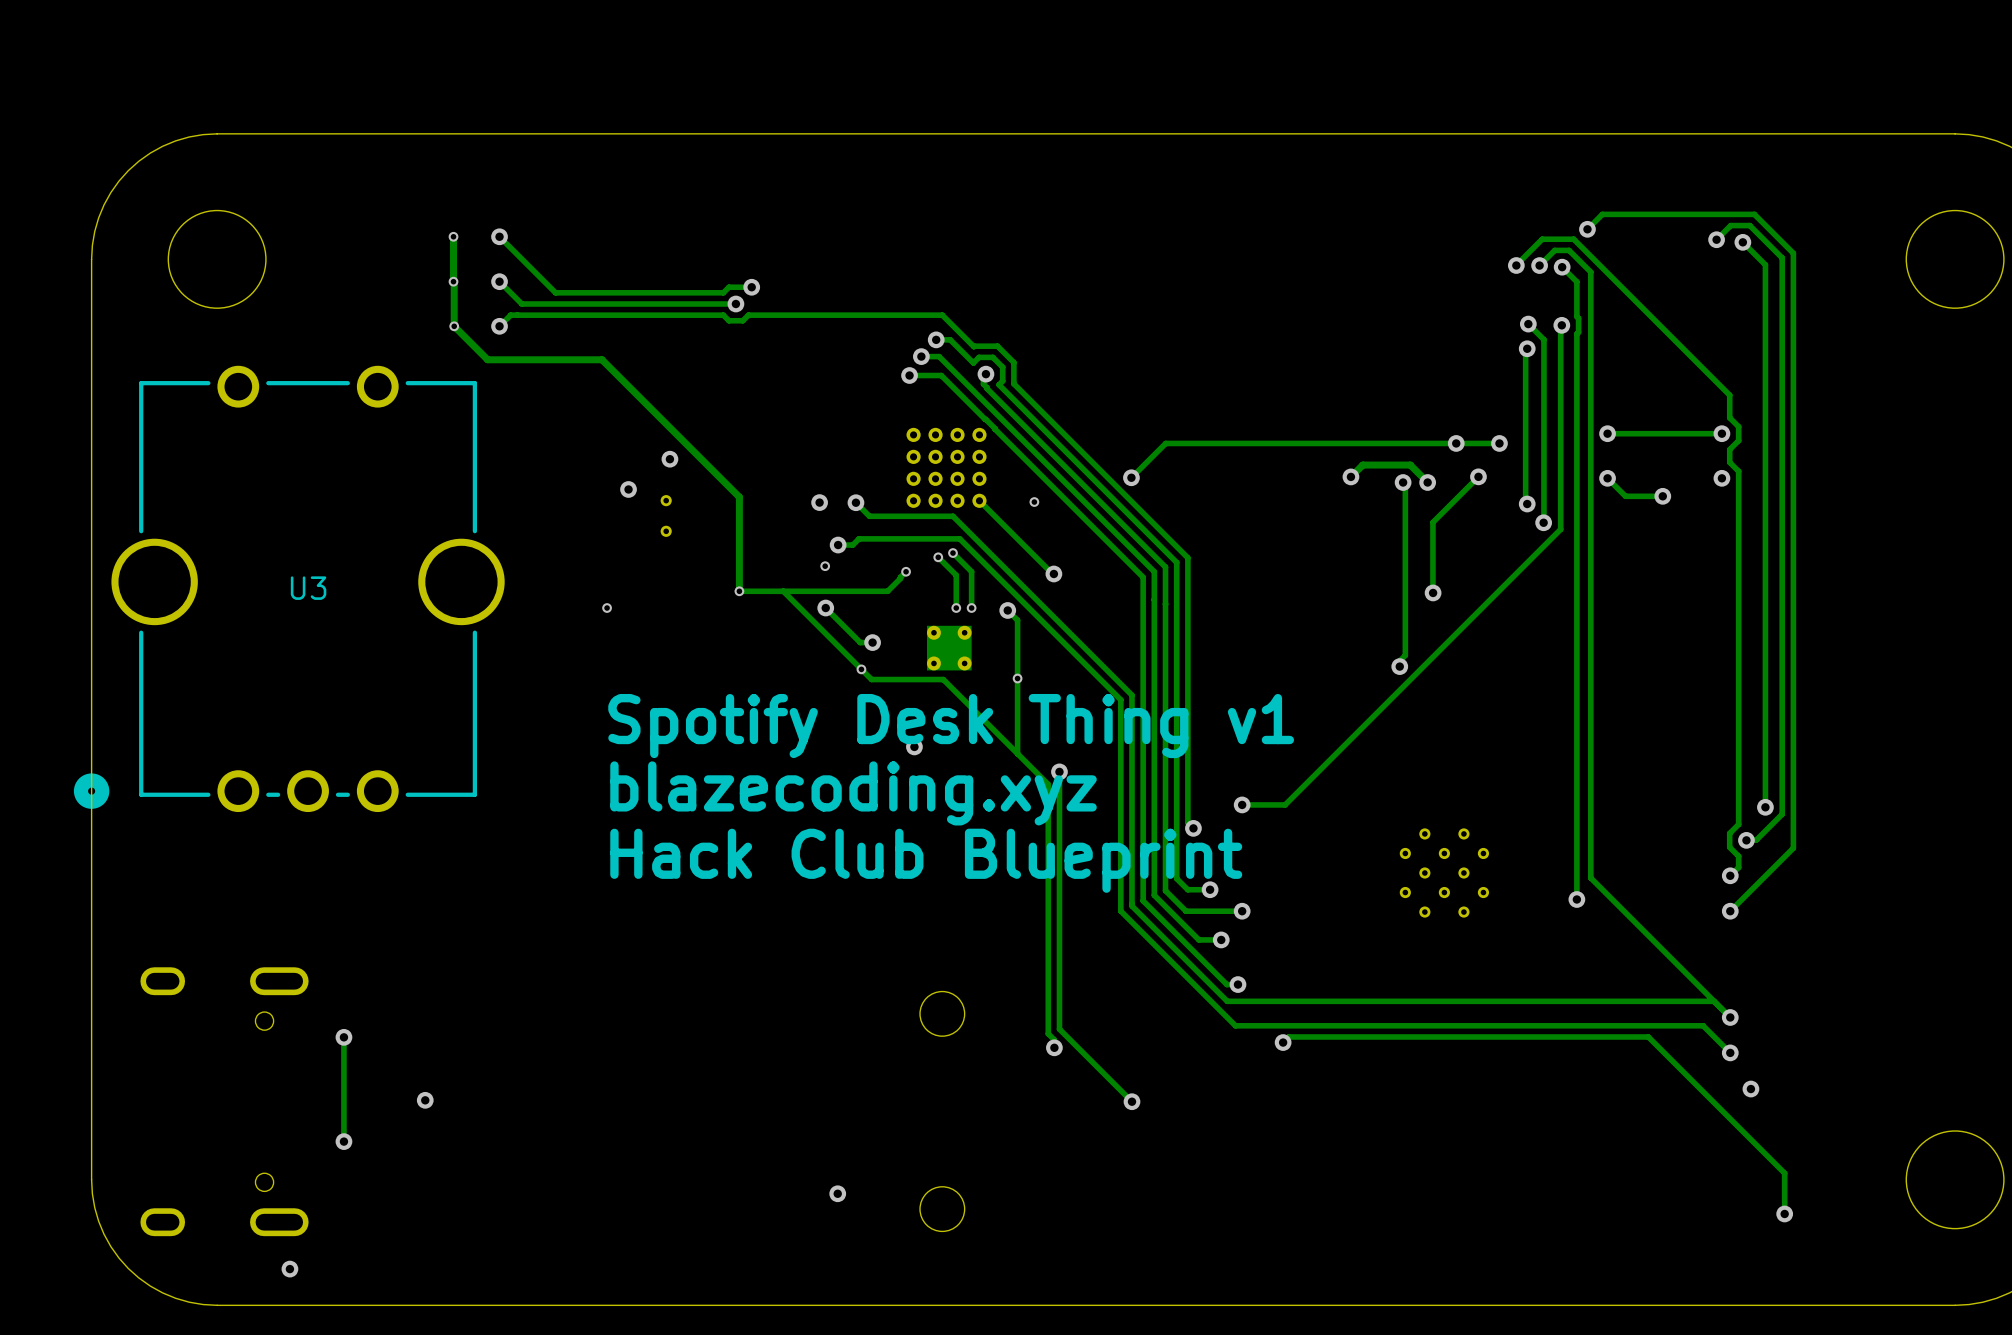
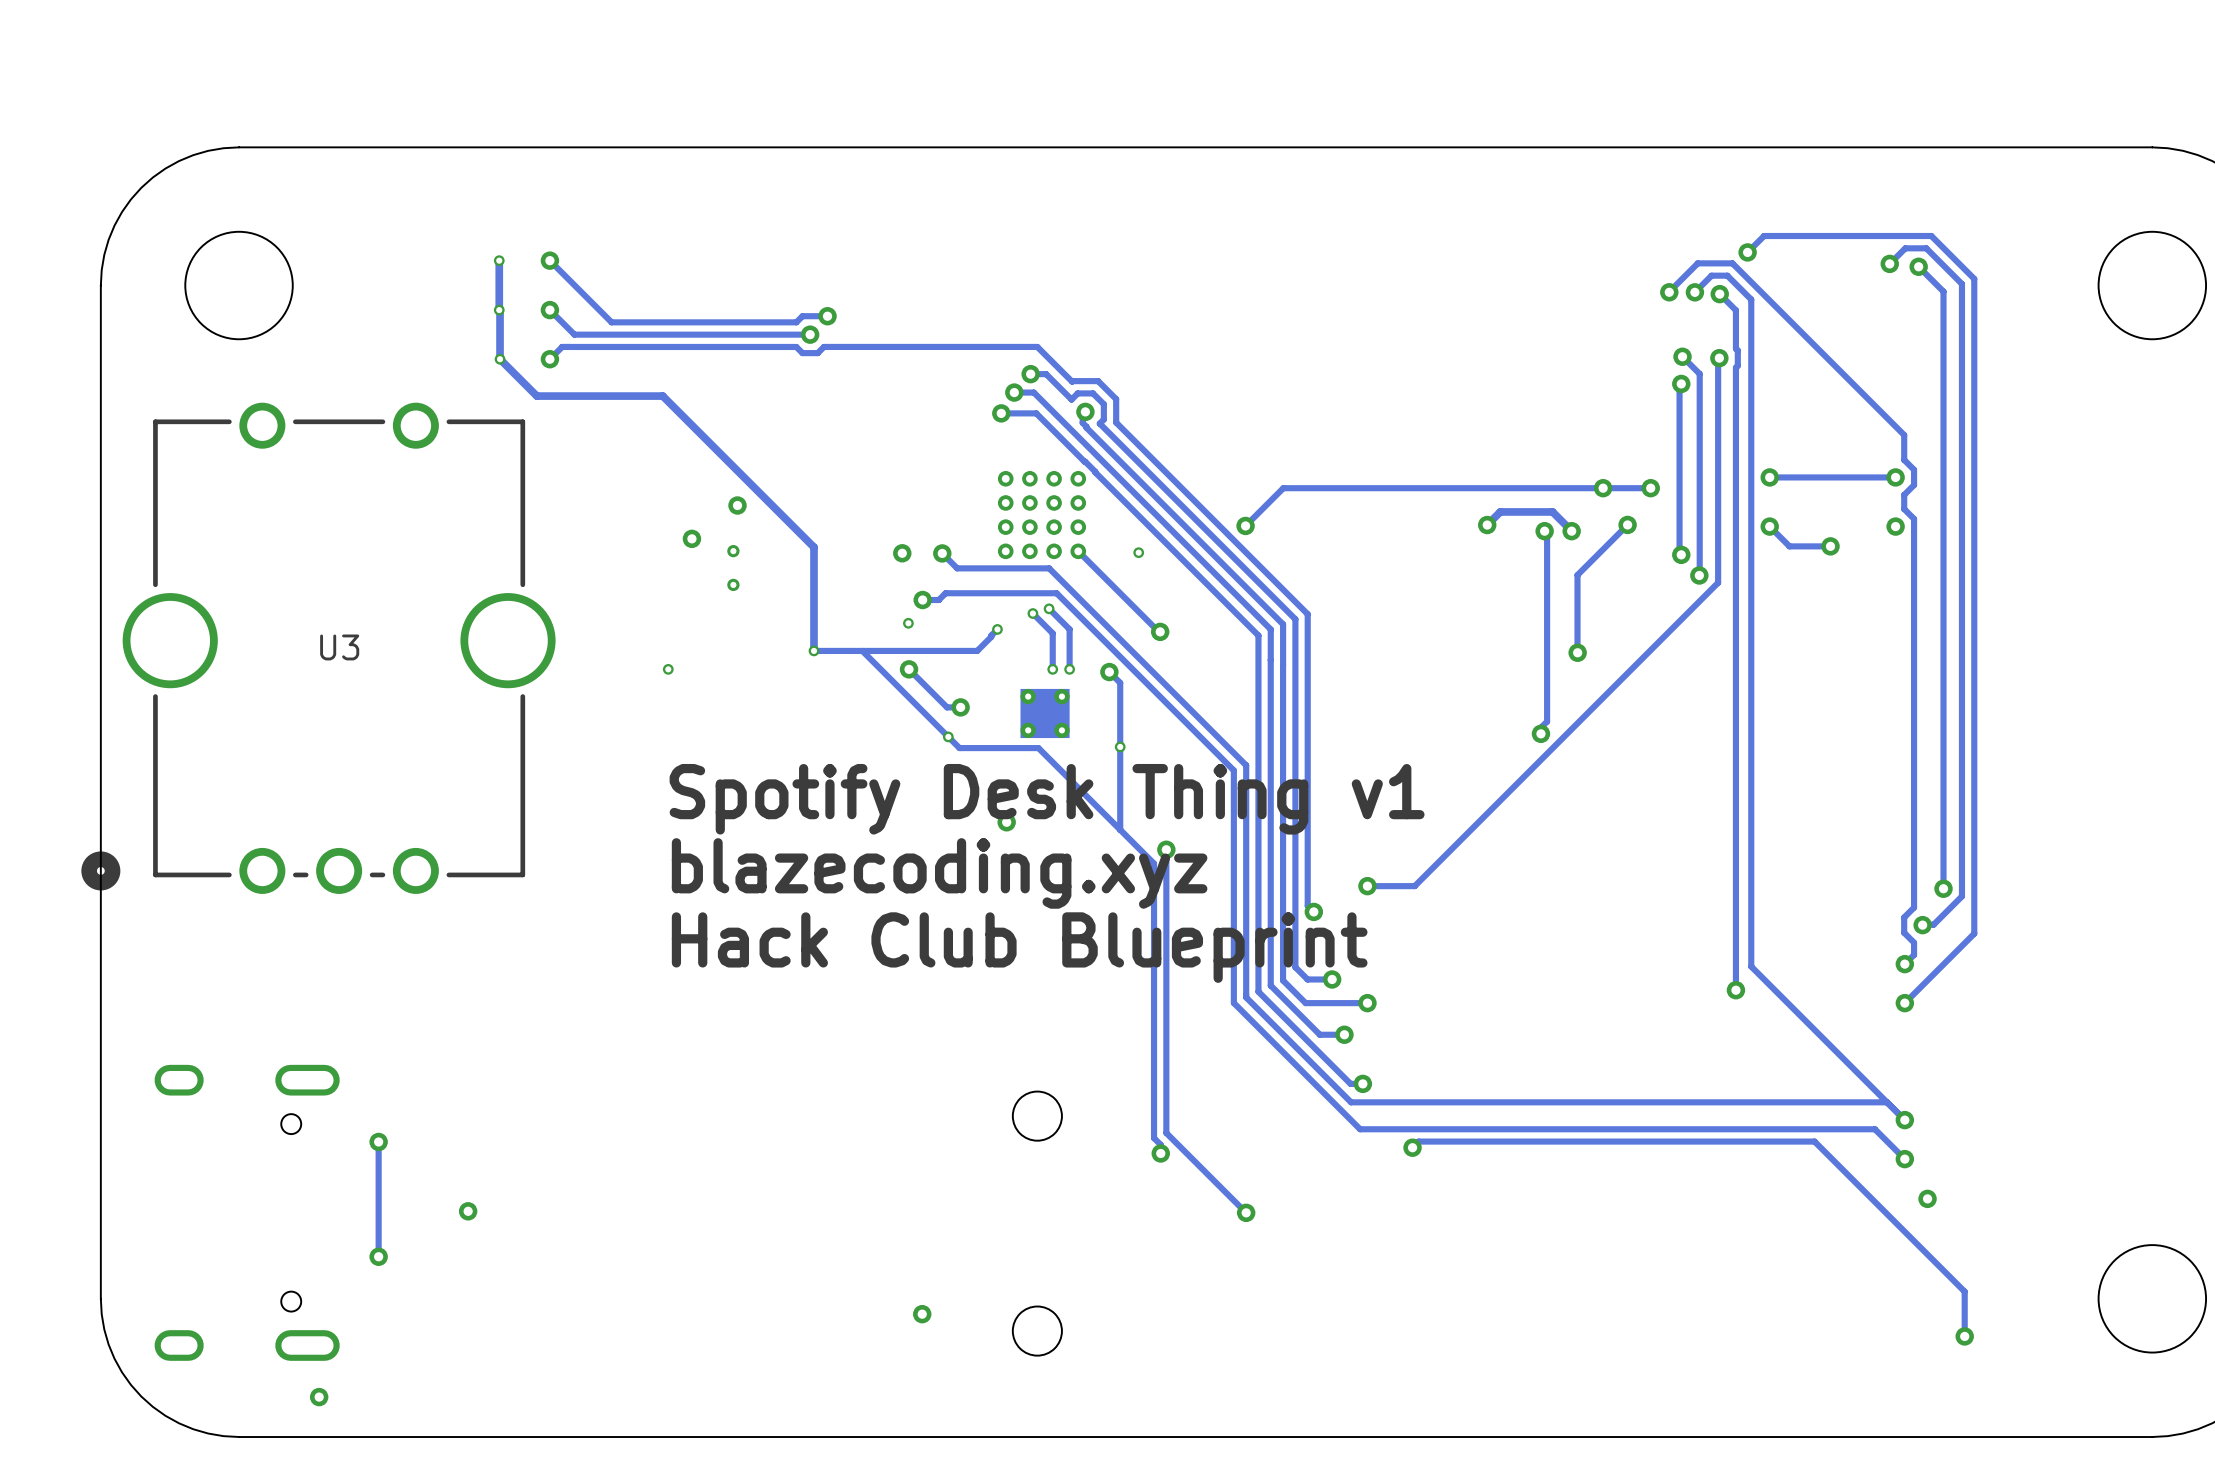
part: (1444, 873) -> none

